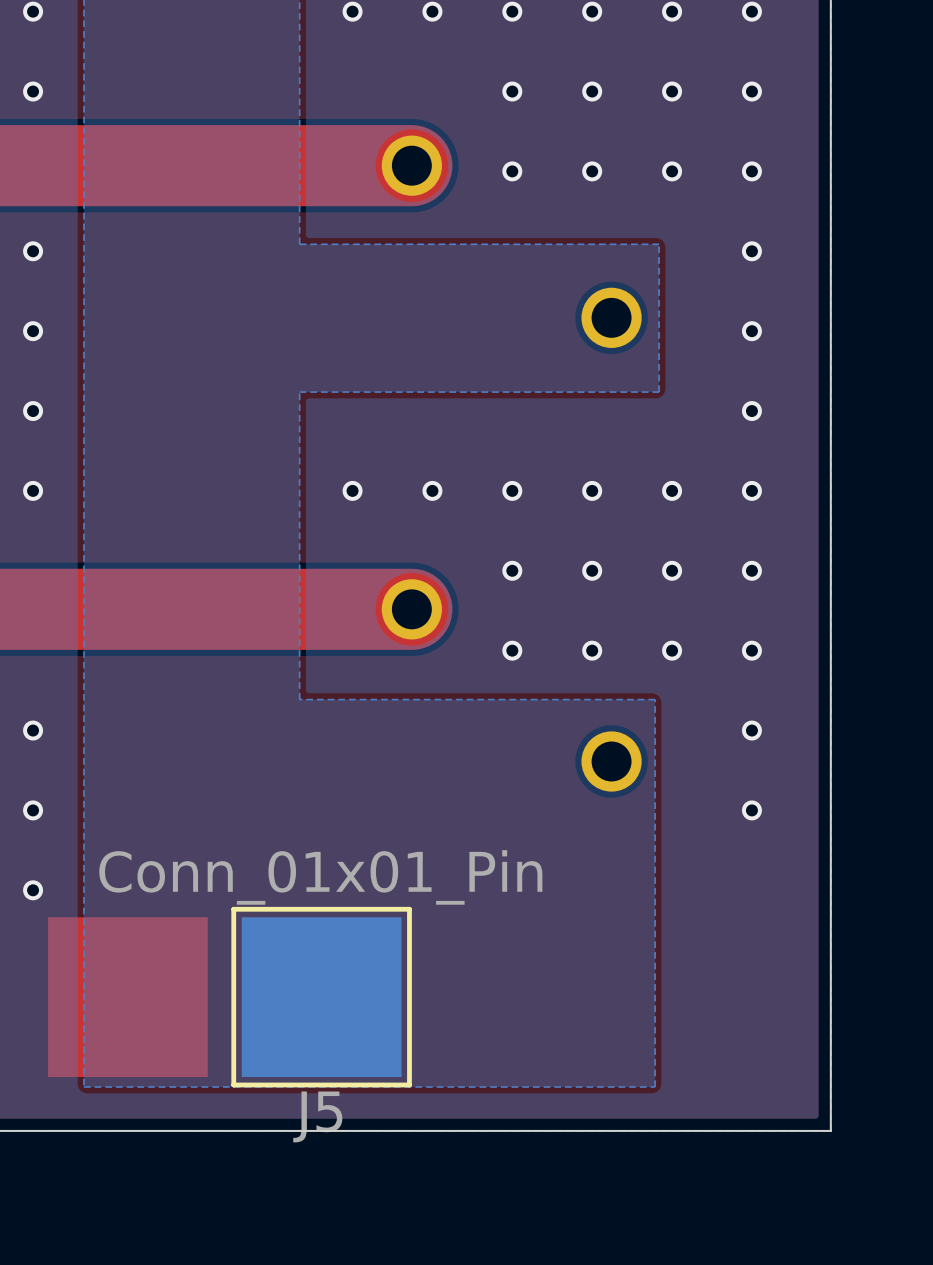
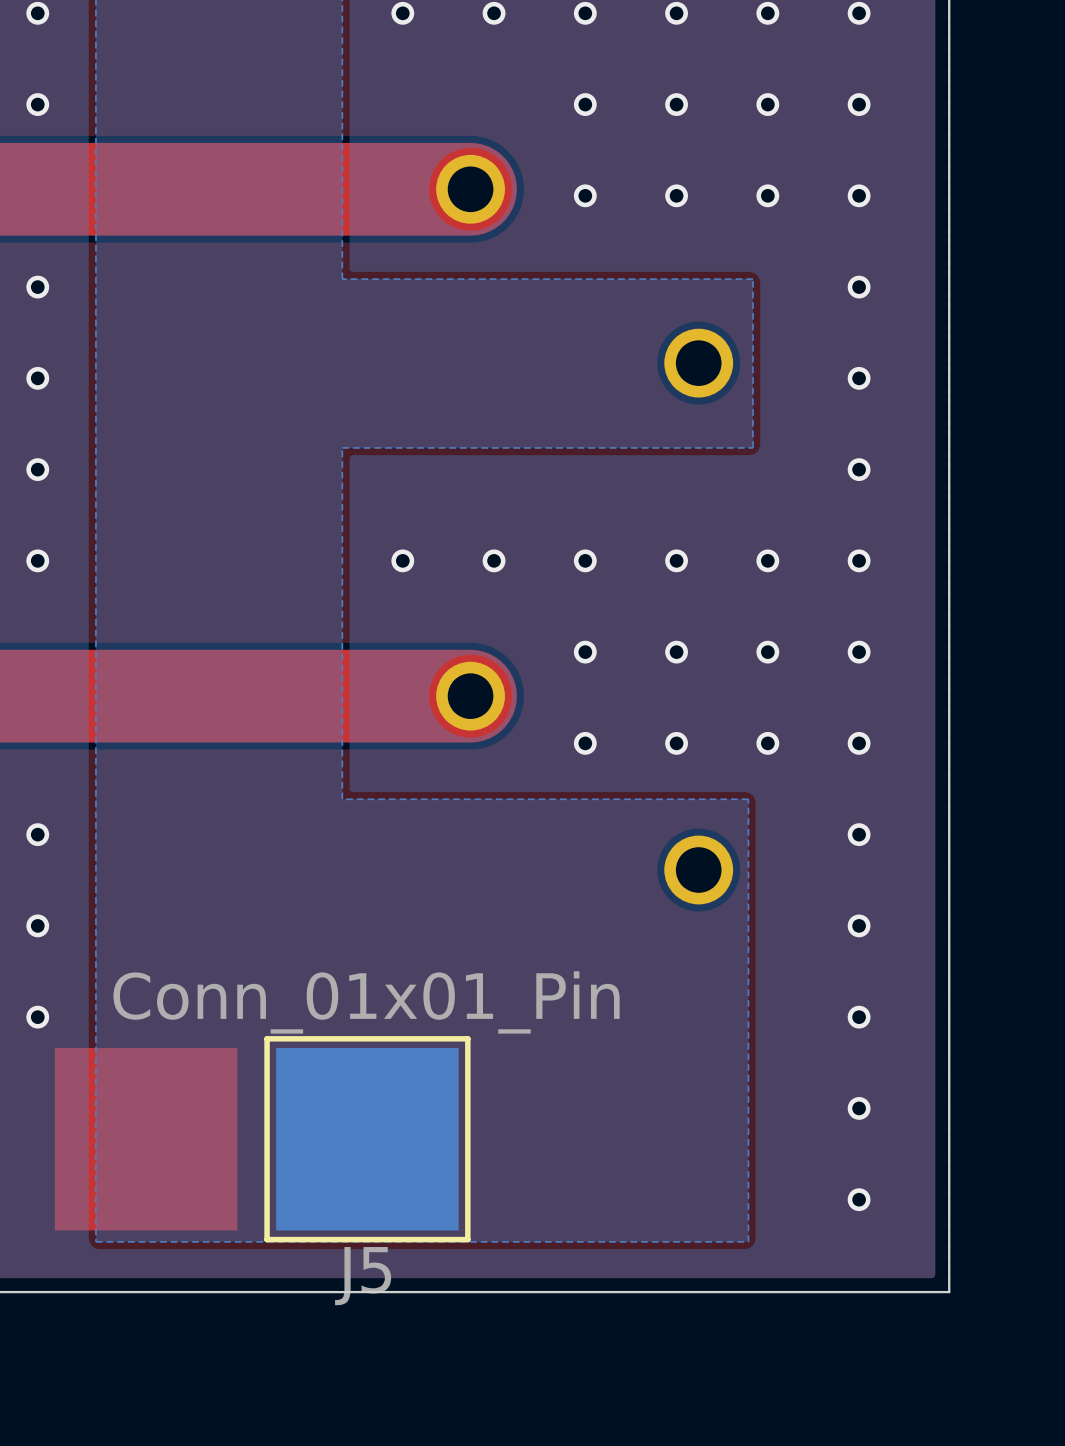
via: none -> (859, 1017)
via: none -> (859, 1108)
via: none -> (859, 1199)

